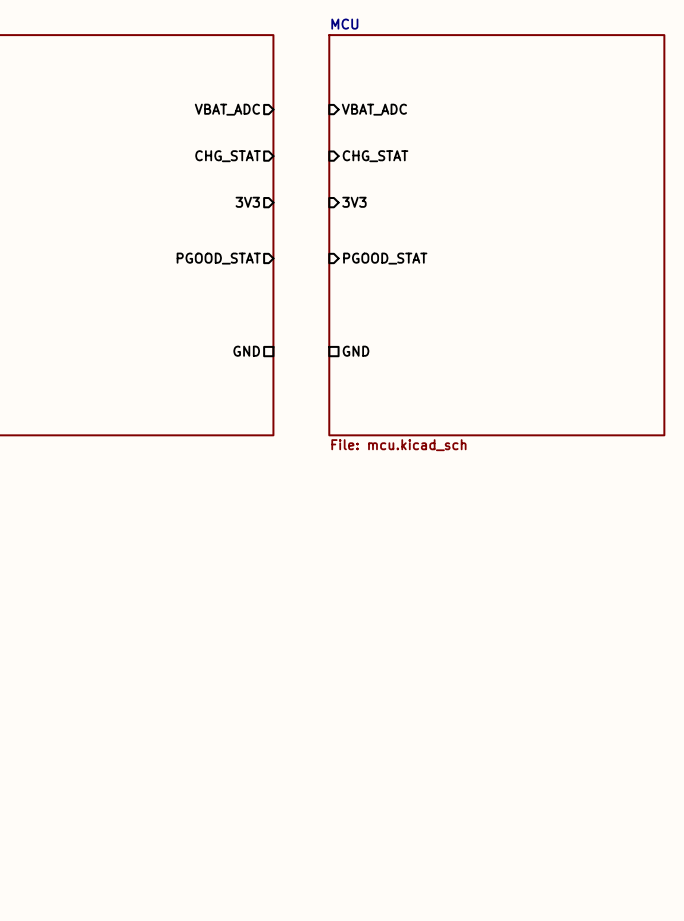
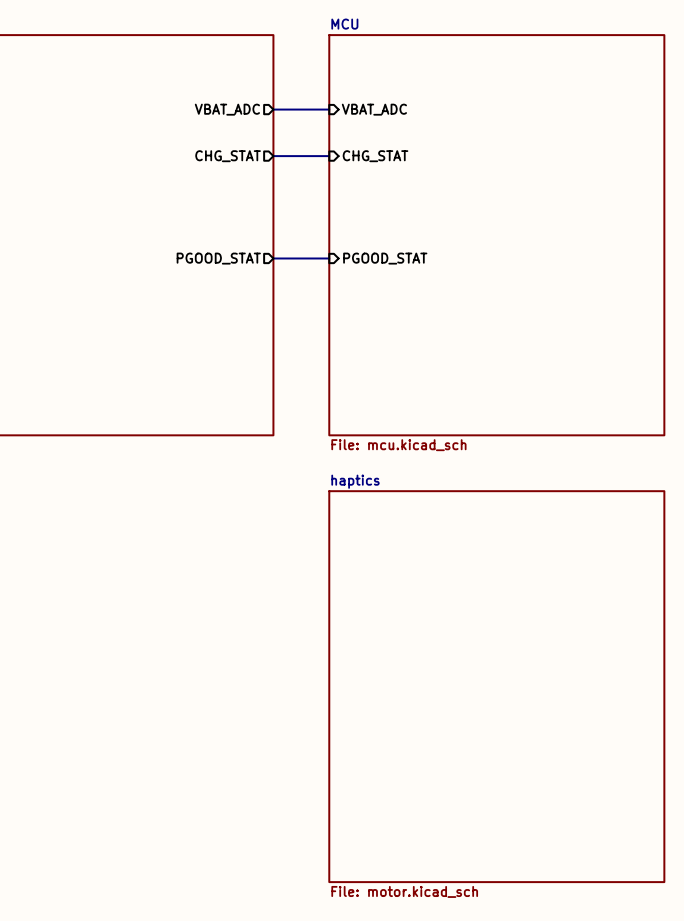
wire: none -> (273, 109) (329, 109)
wire: none -> (273, 156) (329, 156)
sheet pin: 3V3 (247, 202) -> none
sheet pin: 3V3 (354, 202) -> none
wire: none -> (273, 258) (329, 258)
sheet pin: GND (246, 351) -> none
sheet pin: GND (356, 351) -> none
sheet haptics: none -> File: motor.kicad_sch (496, 686)

